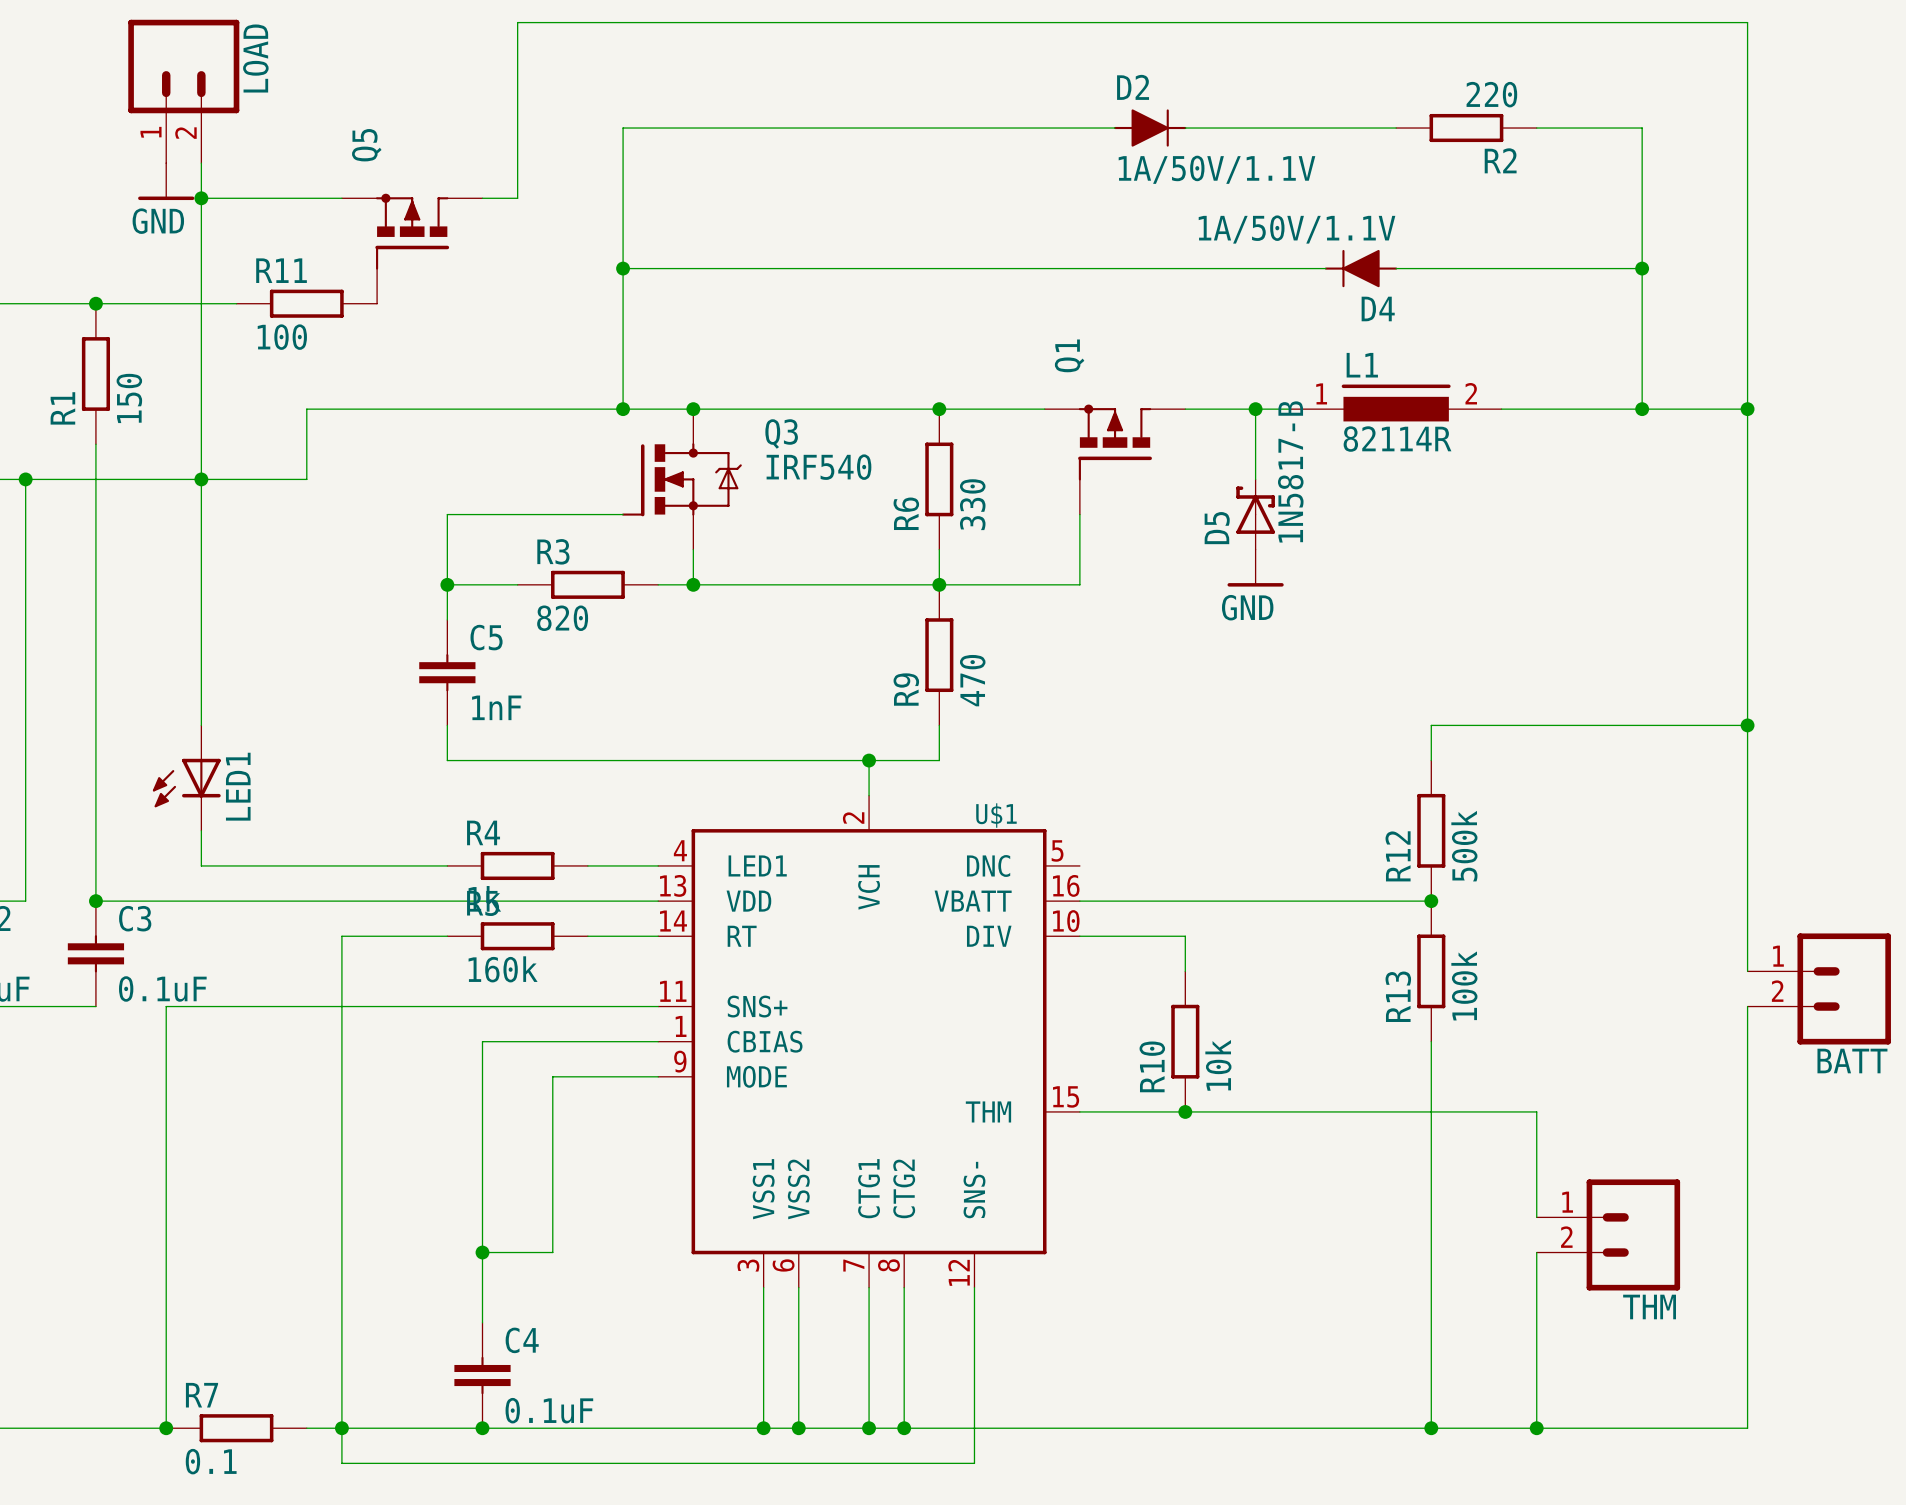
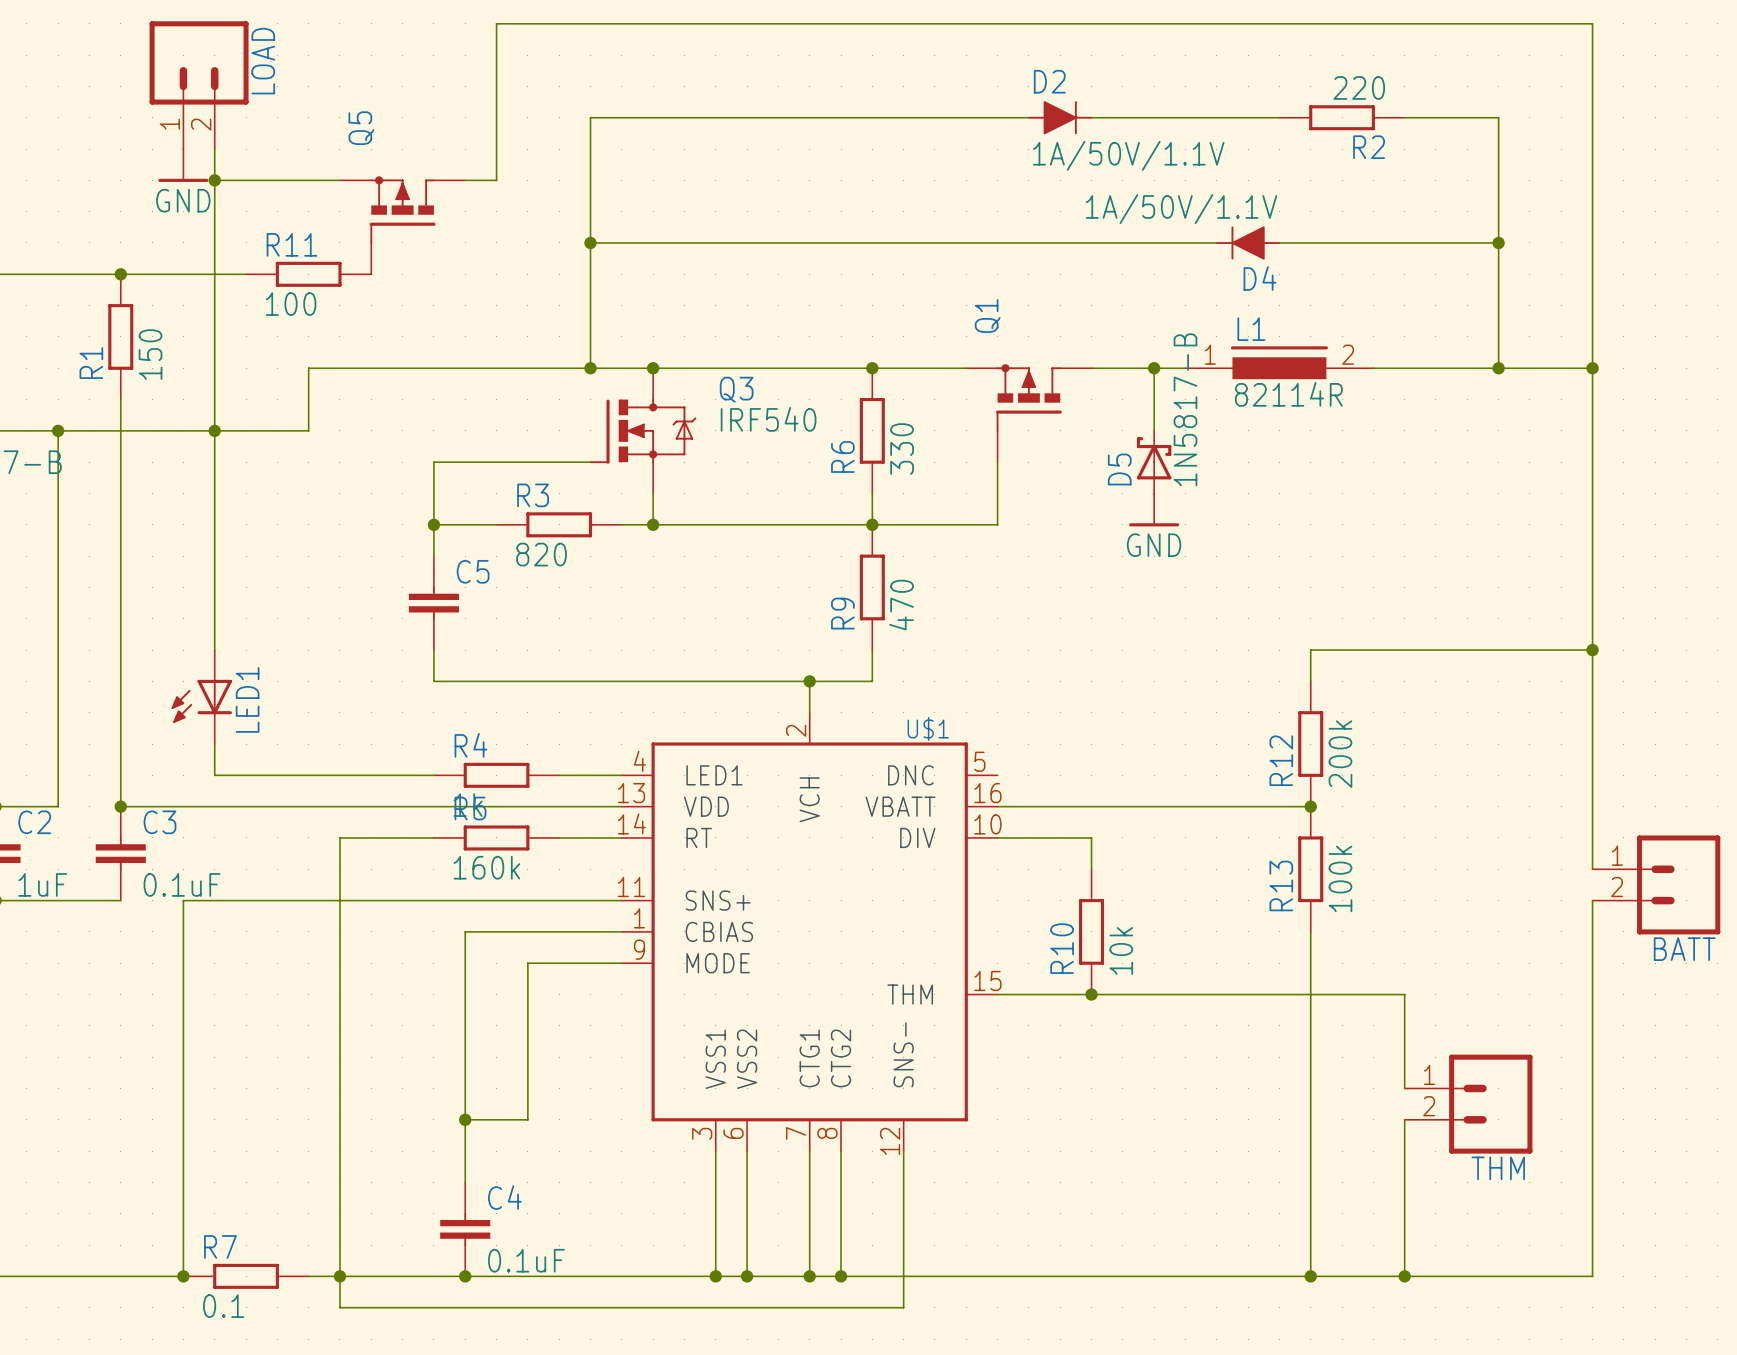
C5 value: 1nF (496, 707) -> none
R12 value: 500k (1464, 846) -> 200k (1340, 754)

